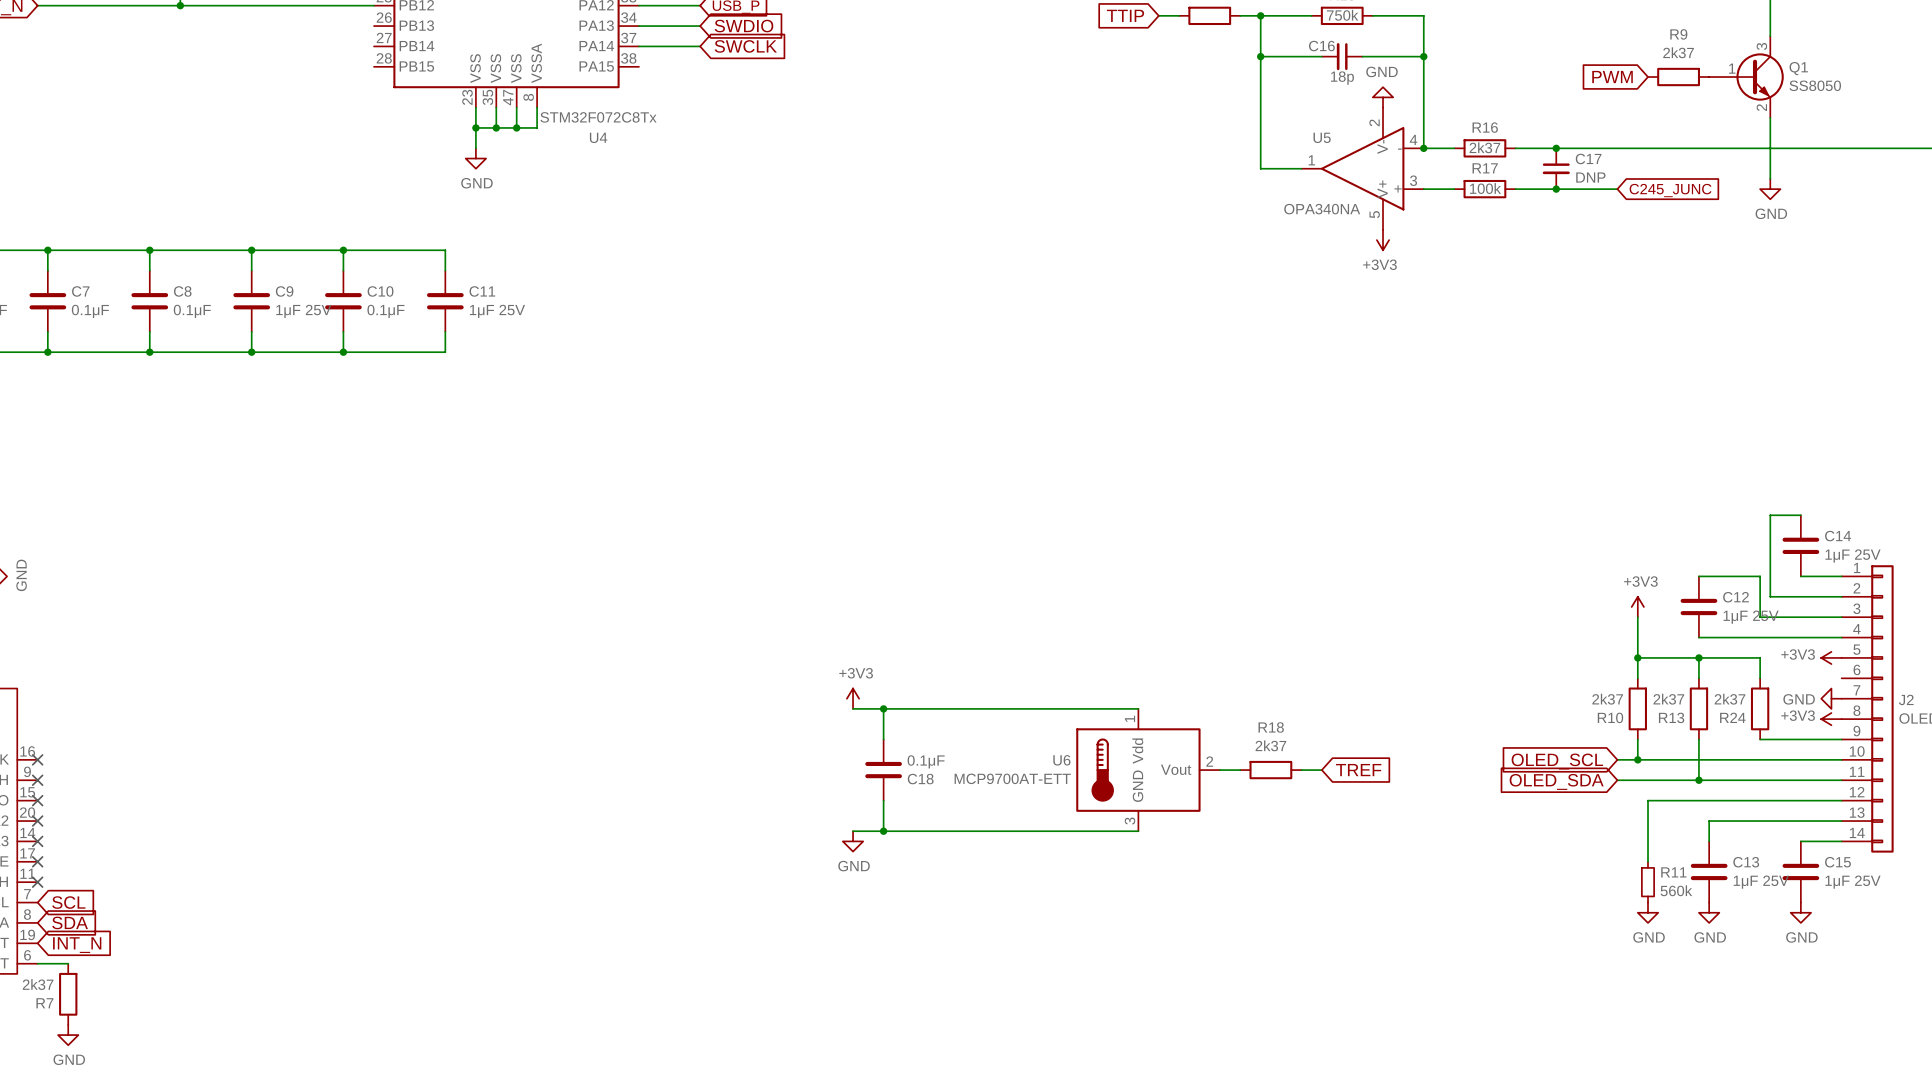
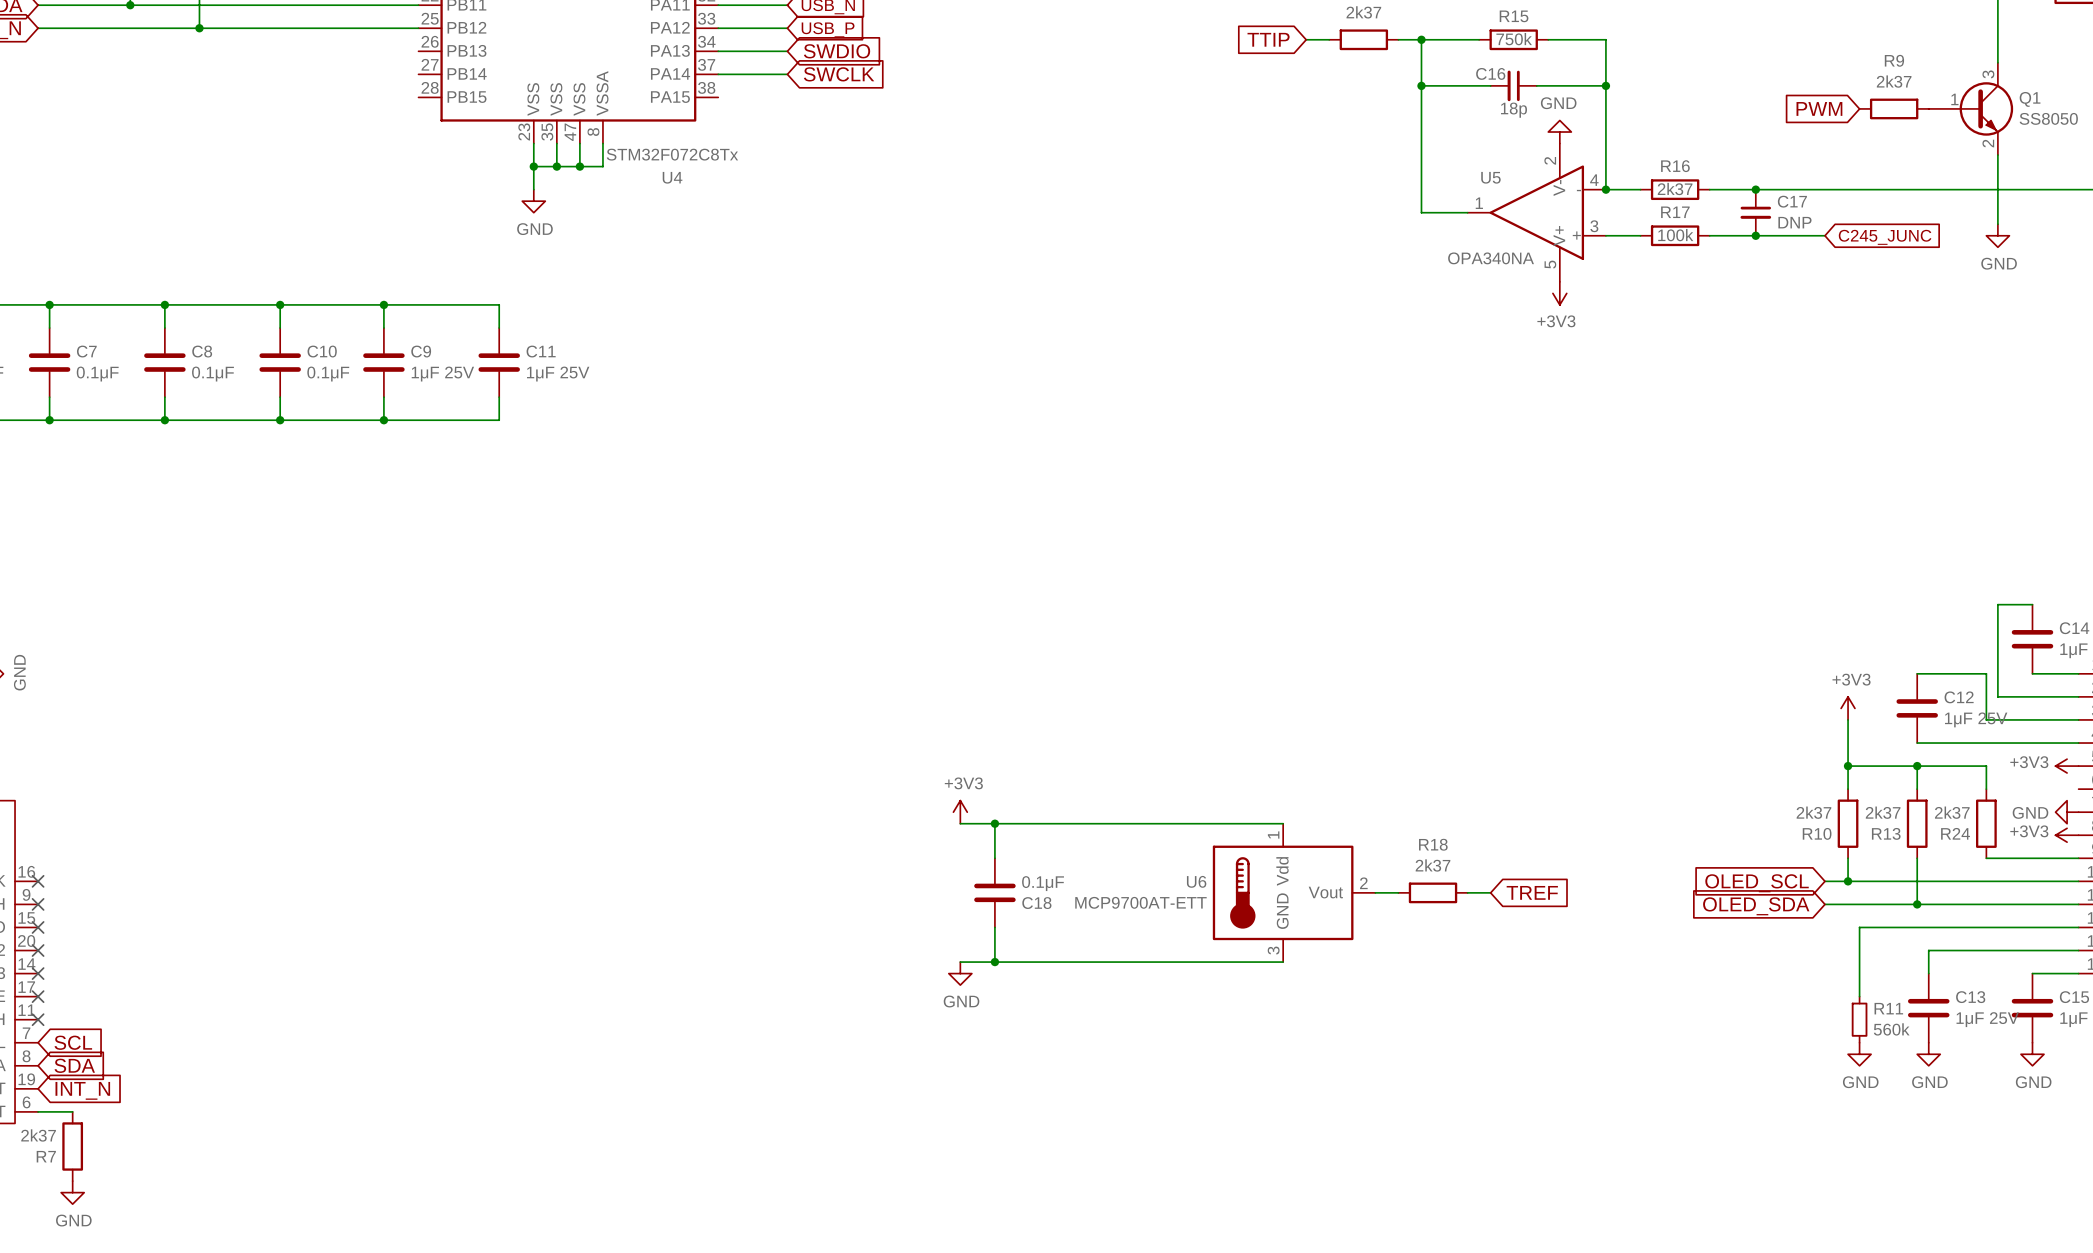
C9 name: C9 (284, 291) -> C10 (322, 351)
C10 name: C10 (380, 291) -> C9 (421, 351)
C9 value: 1μF 25V (303, 311) -> 0.1μF (328, 374)
C10 value: 0.1μF (385, 311) -> 1μF 25V (442, 374)

